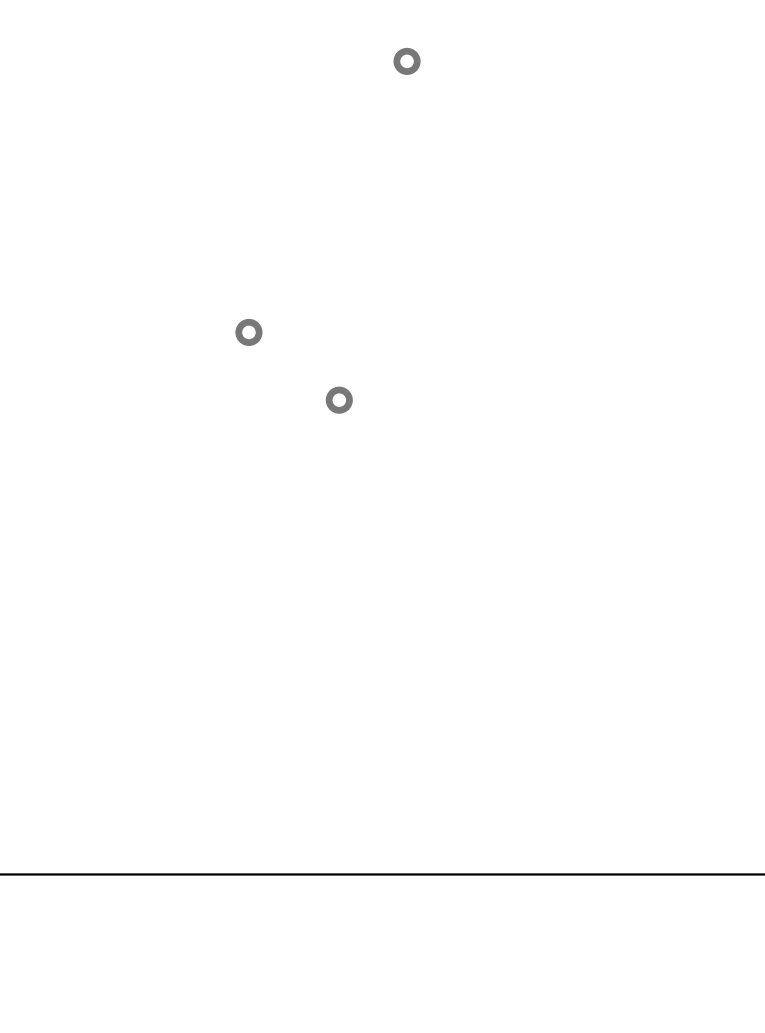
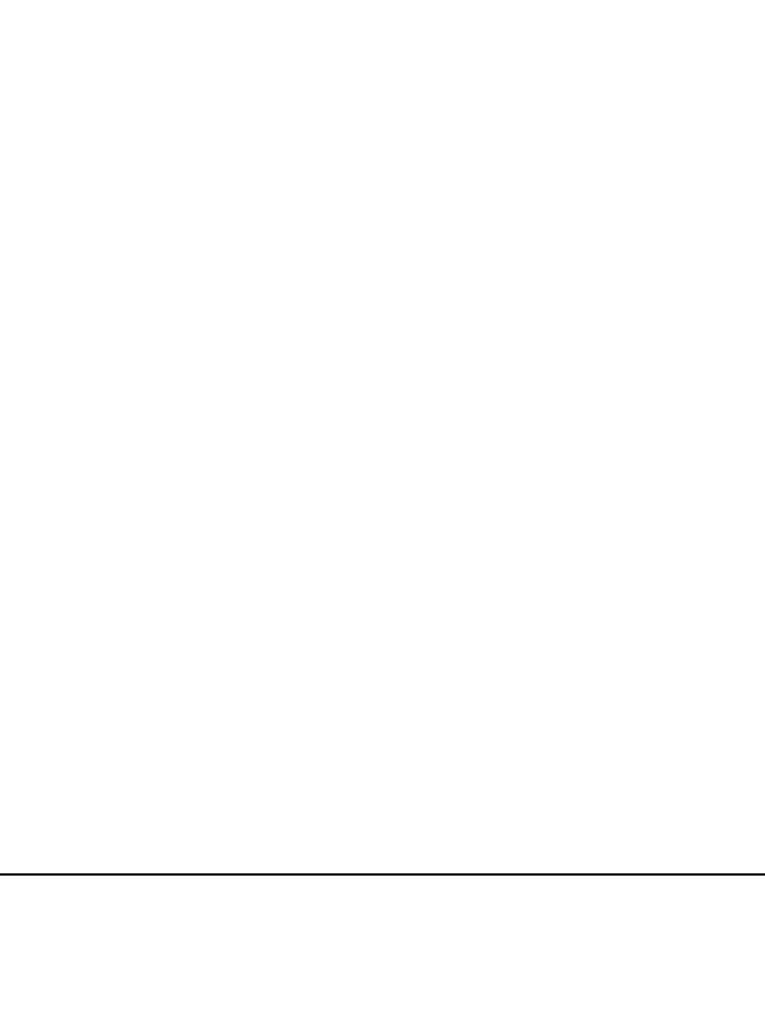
via: (407, 61) -> none
via: (248, 332) -> none
via: (339, 400) -> none

